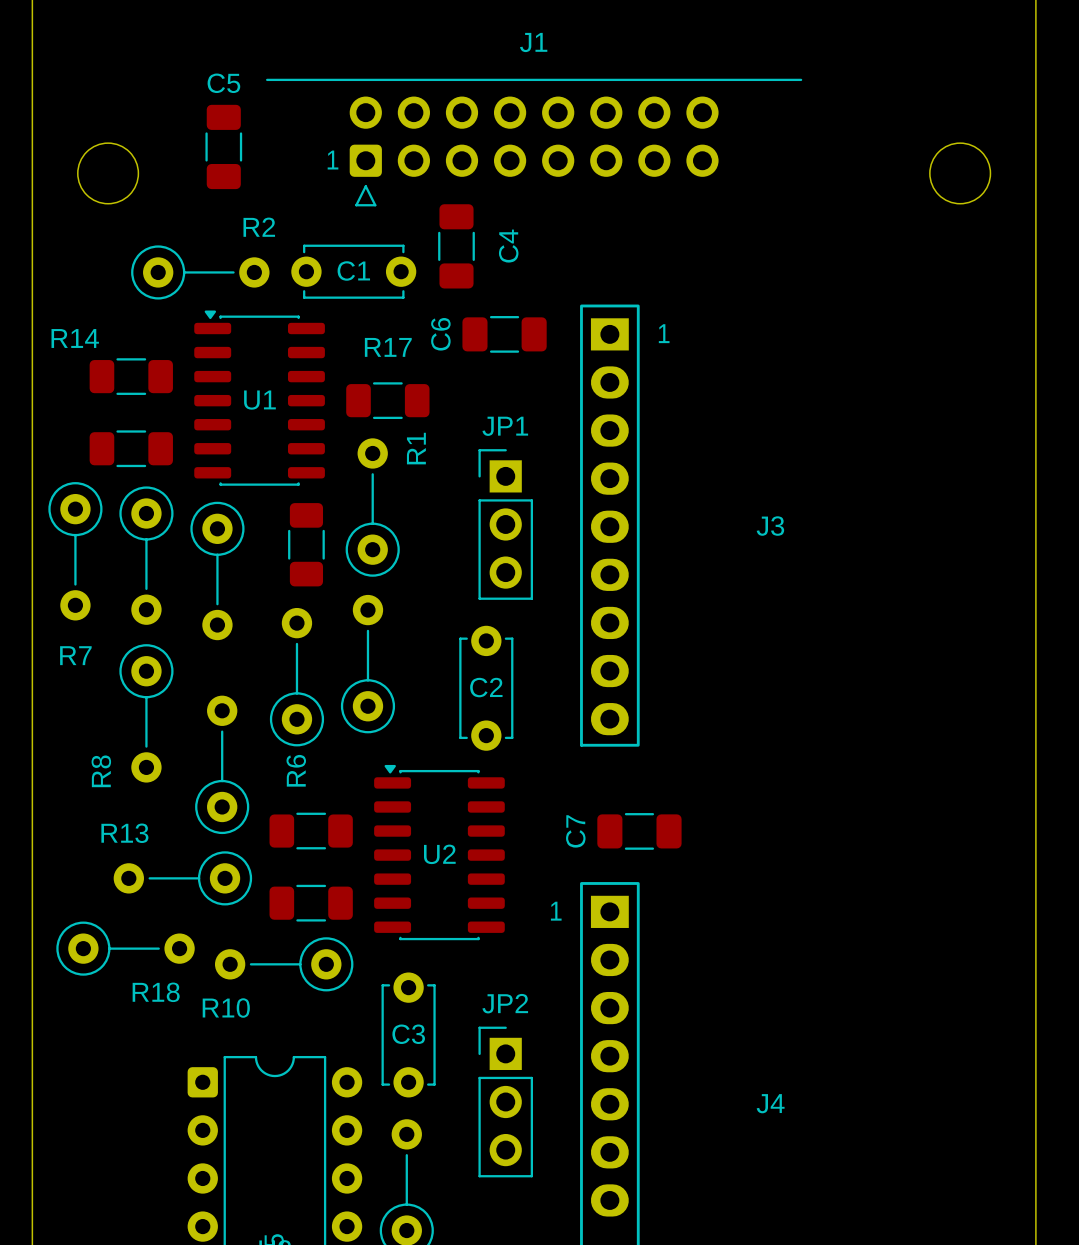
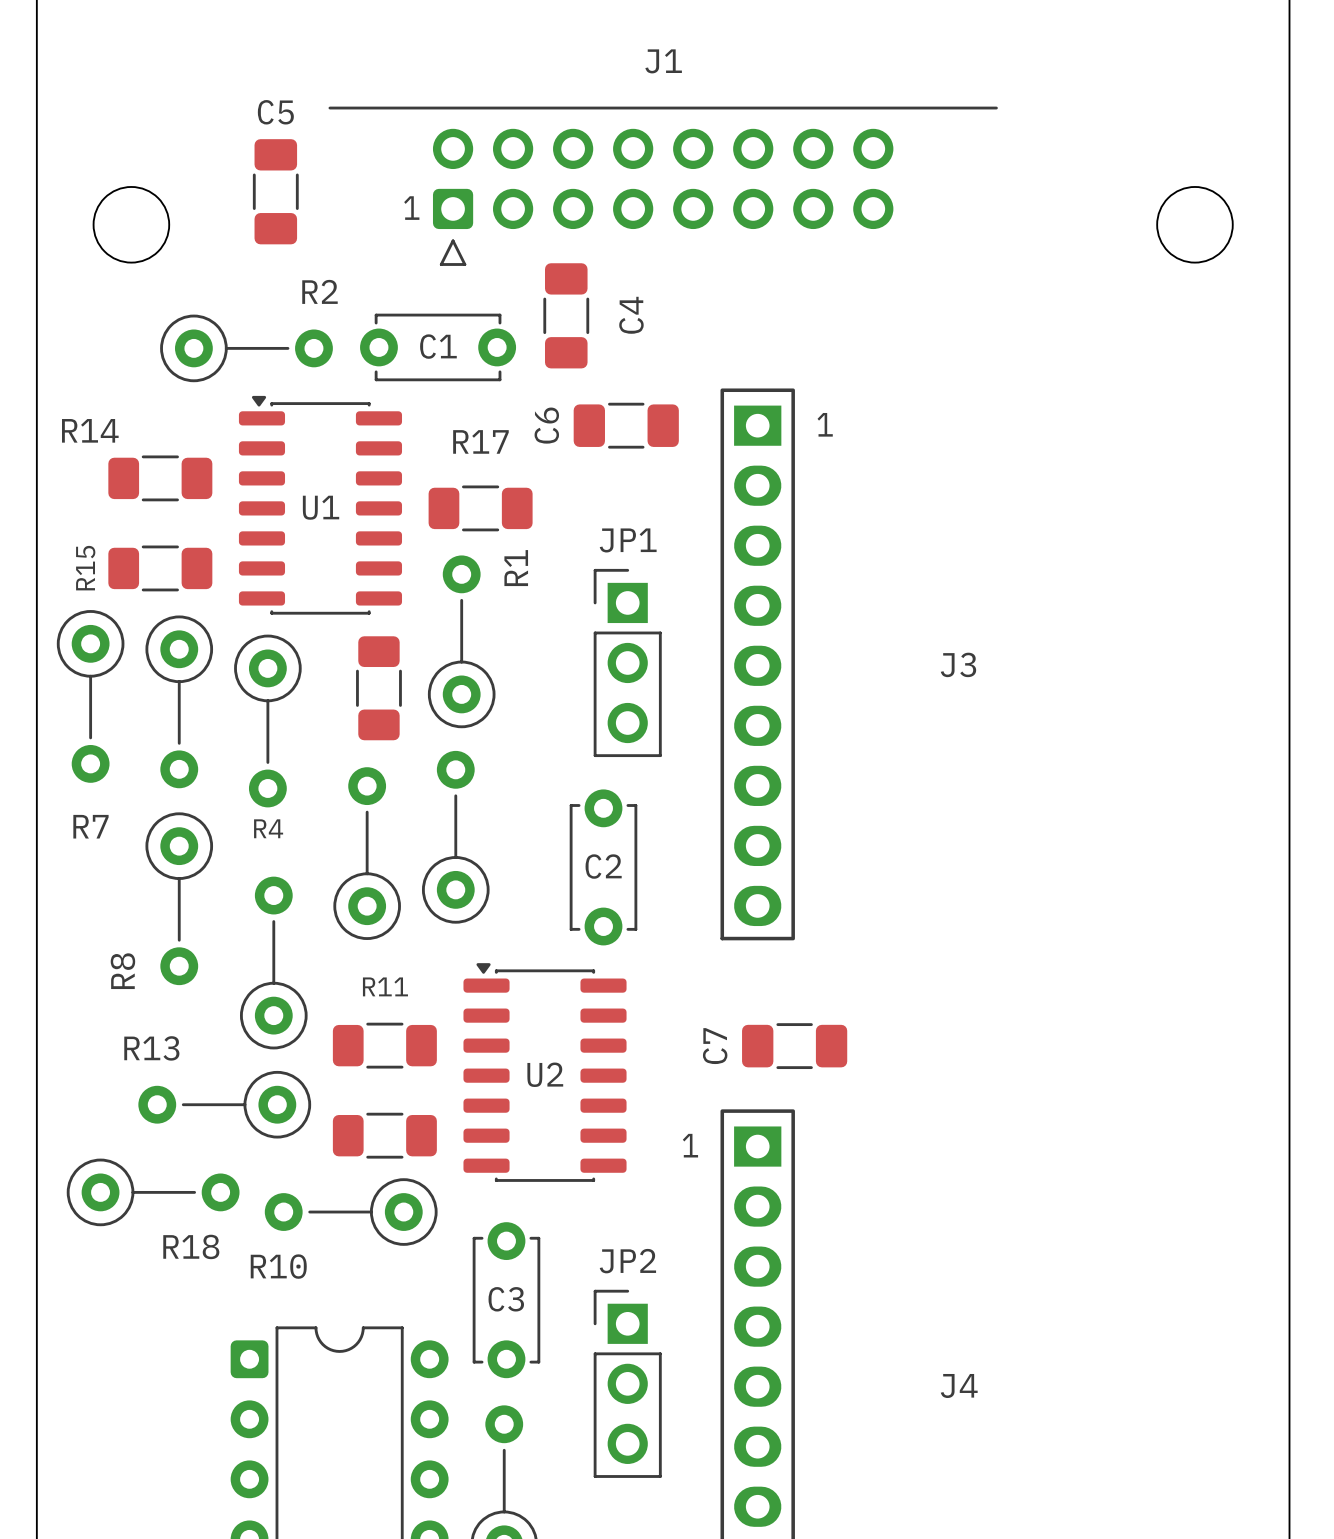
R15 name: none -> R15 (85, 568)
R4 name: none -> R4 (268, 828)
R6 name: R6 (296, 770) -> none
R11 name: none -> R11 (385, 986)

